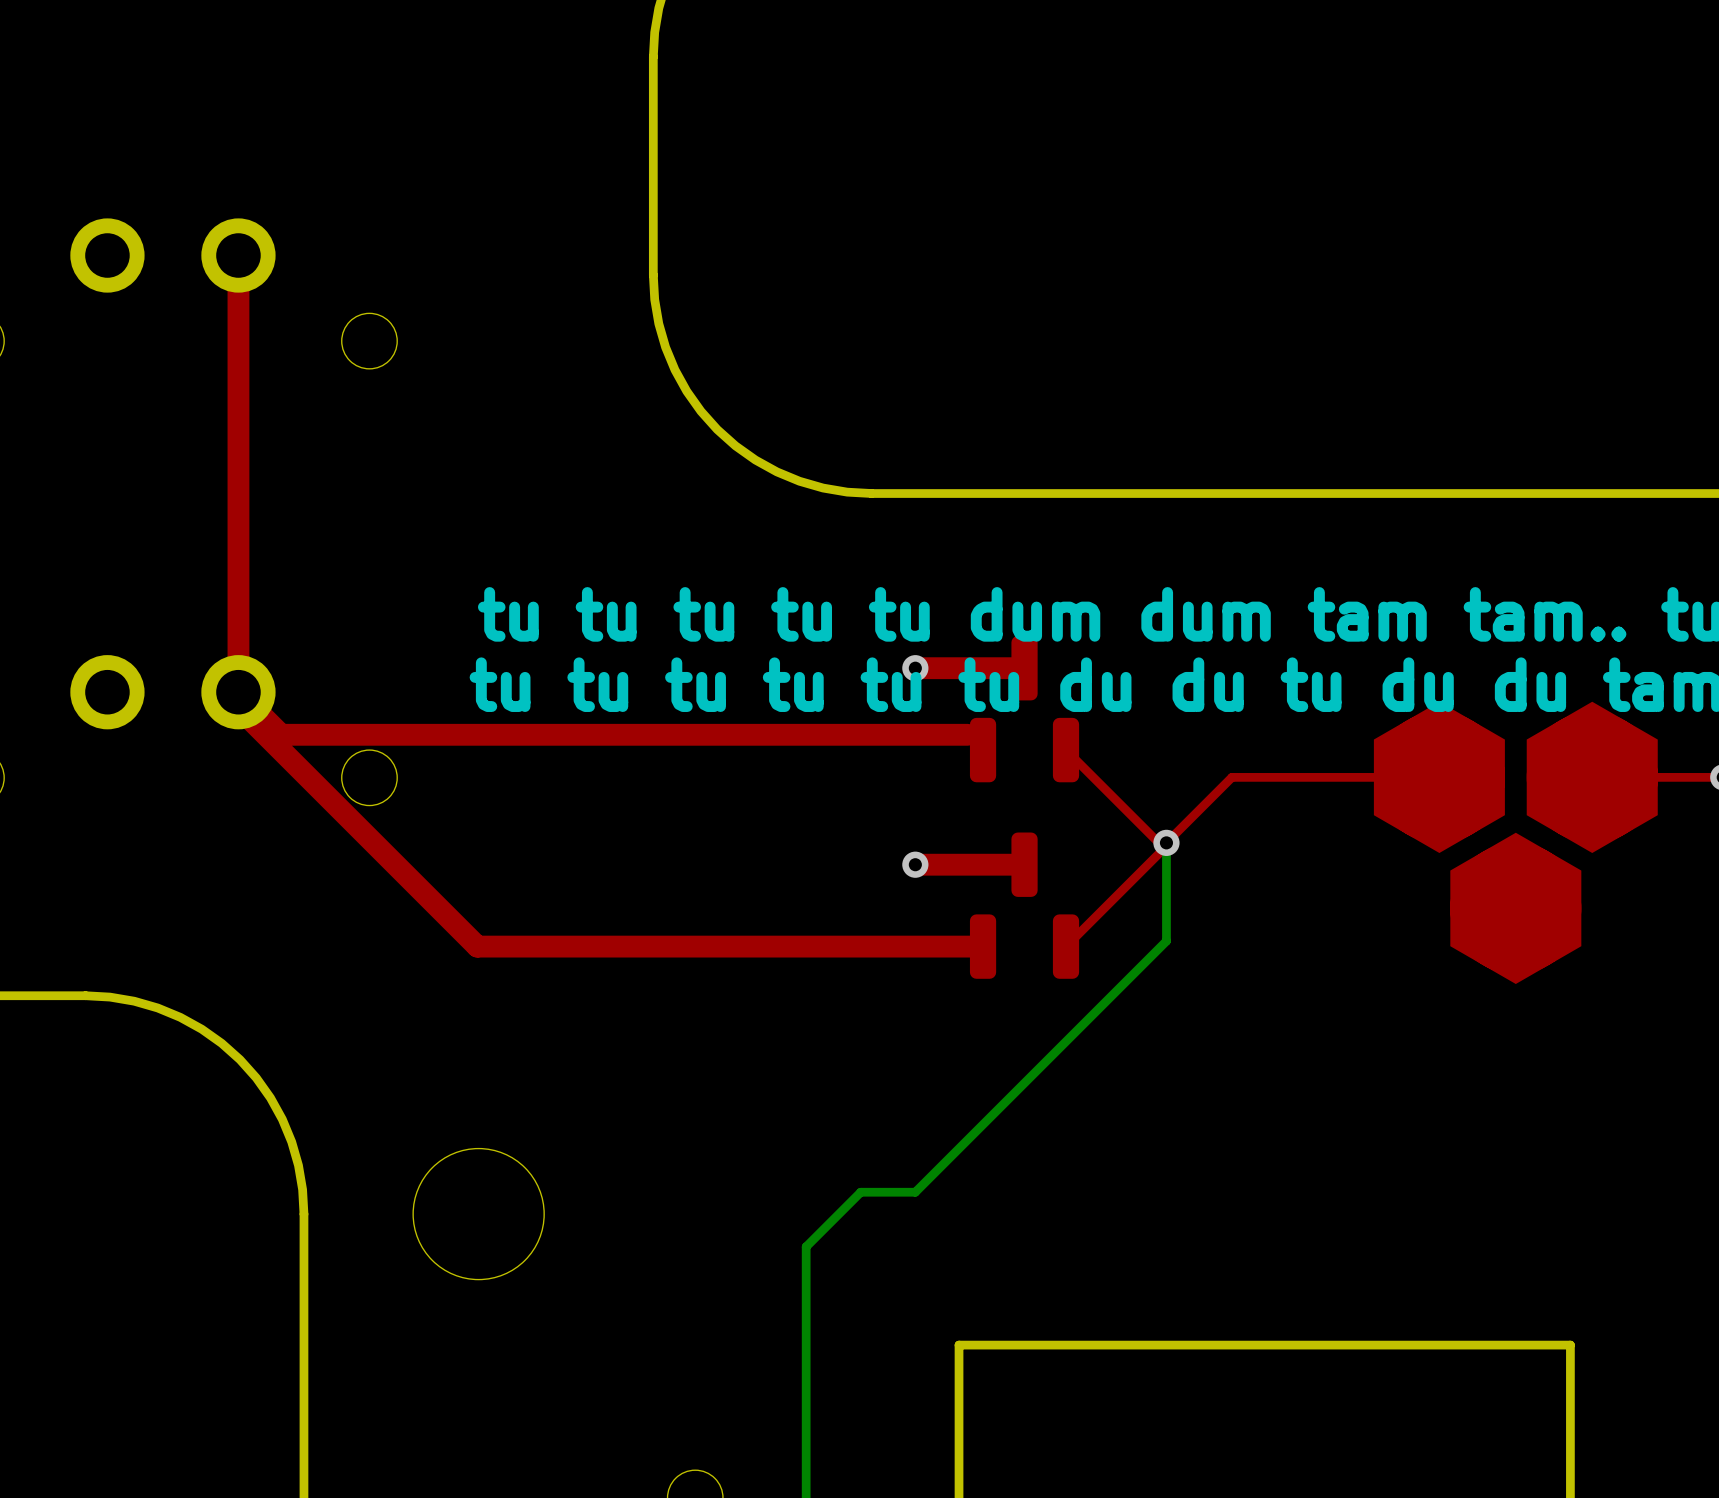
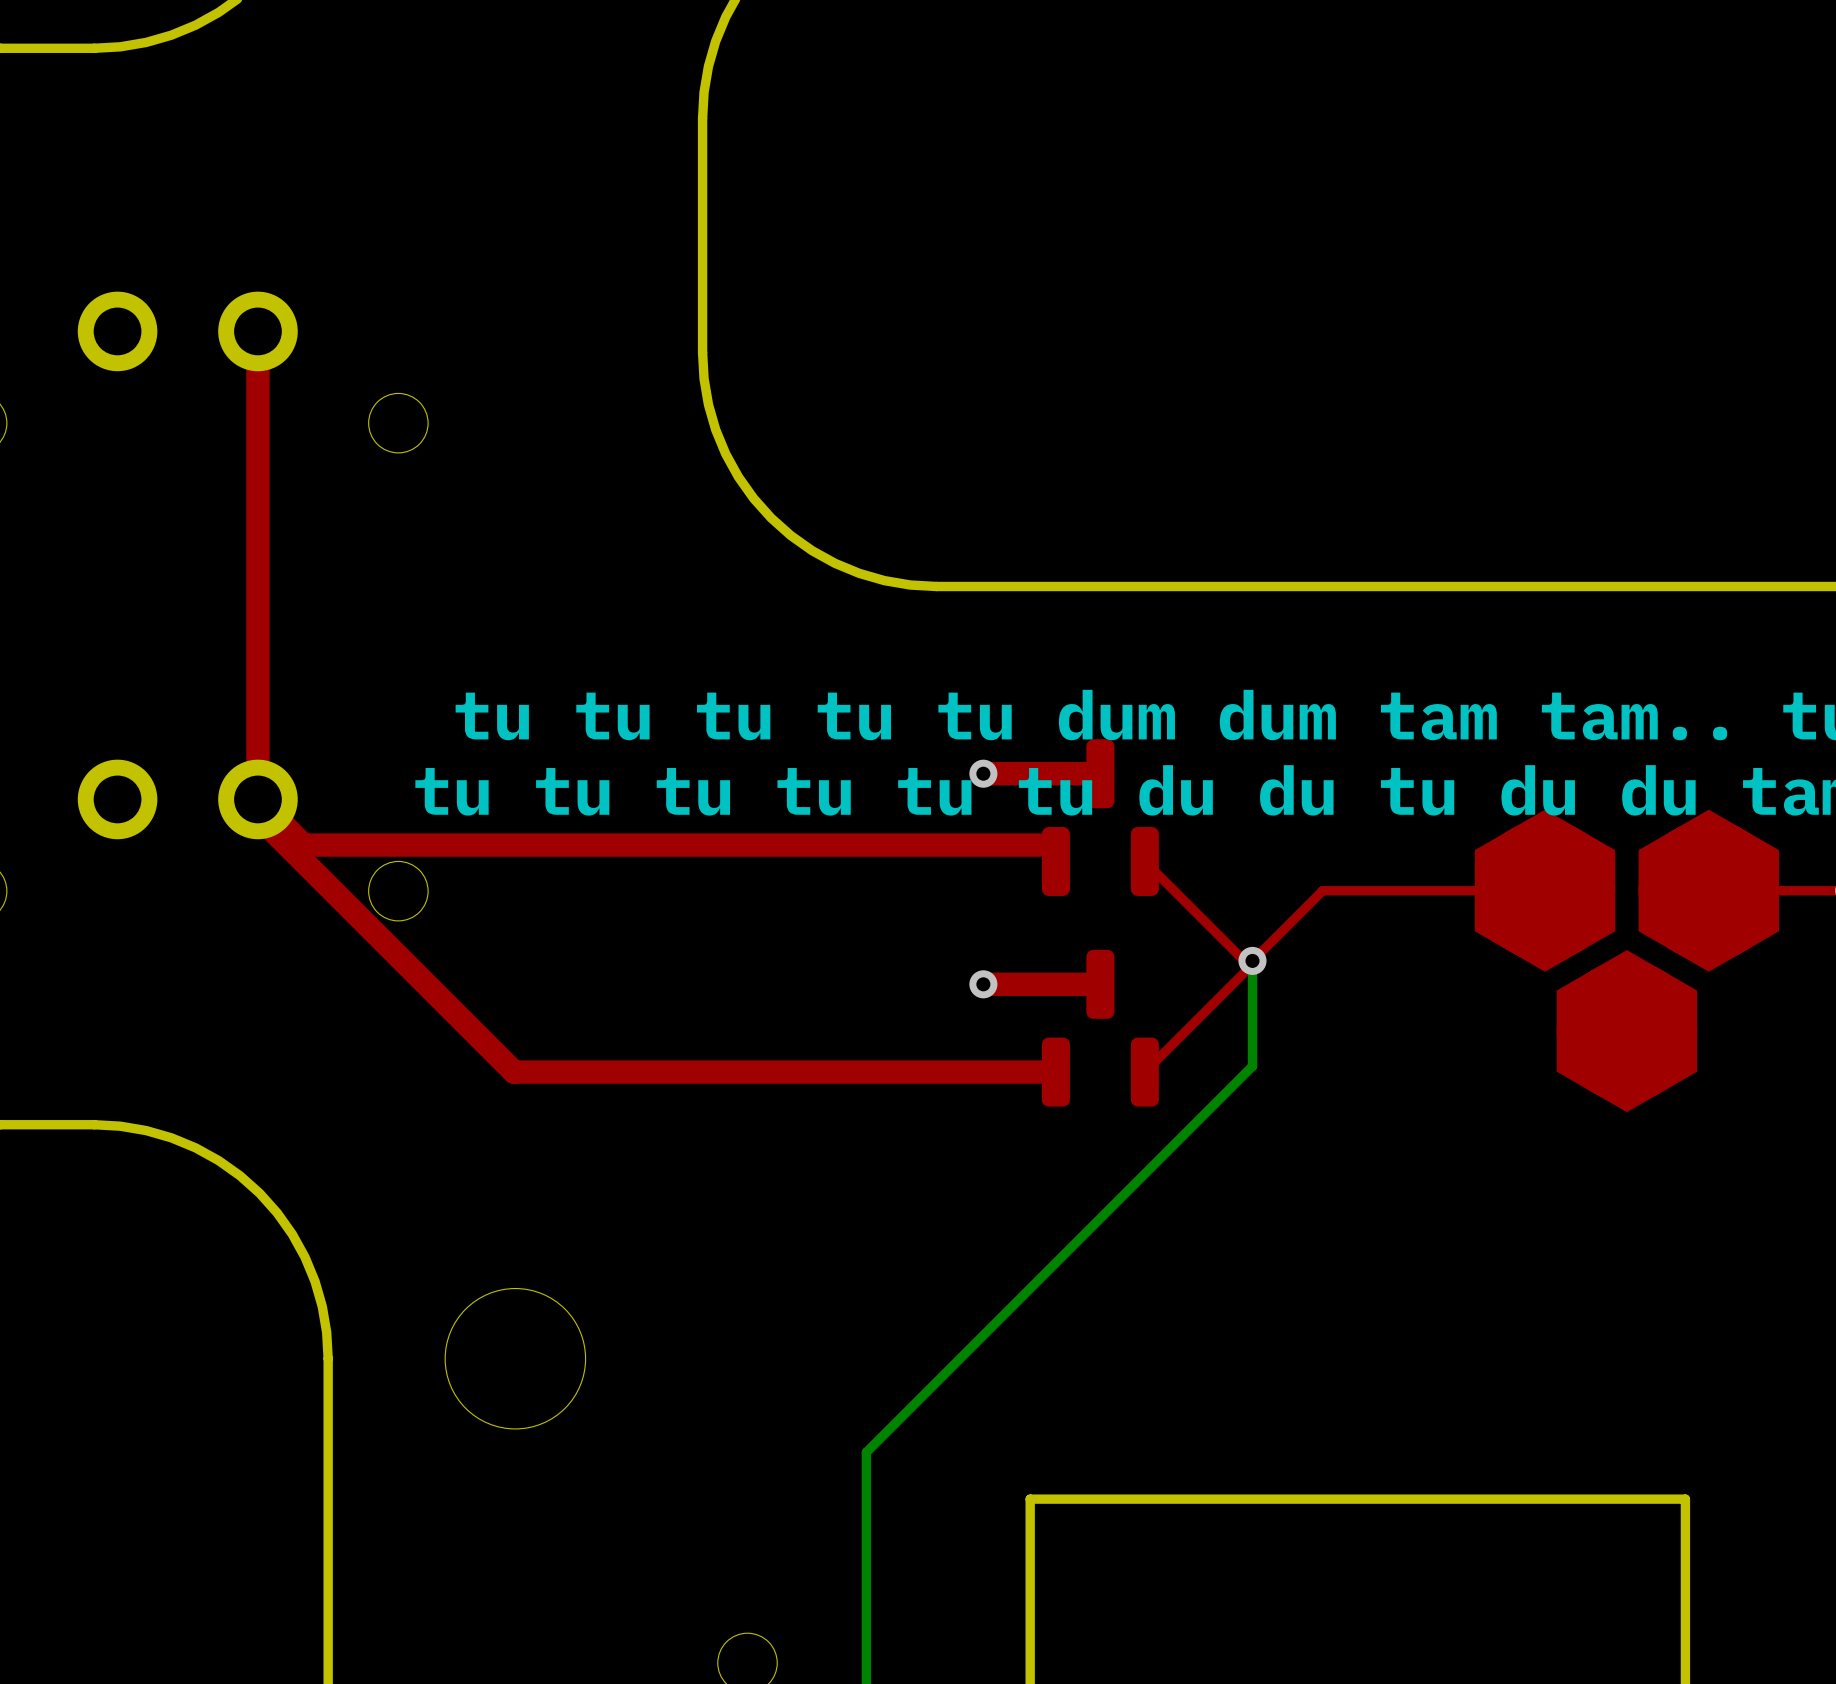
bottom track: (915, 1192) (860, 1192) (806, 1246) (806, 1301) -> (983, 1335) (866, 1452)

